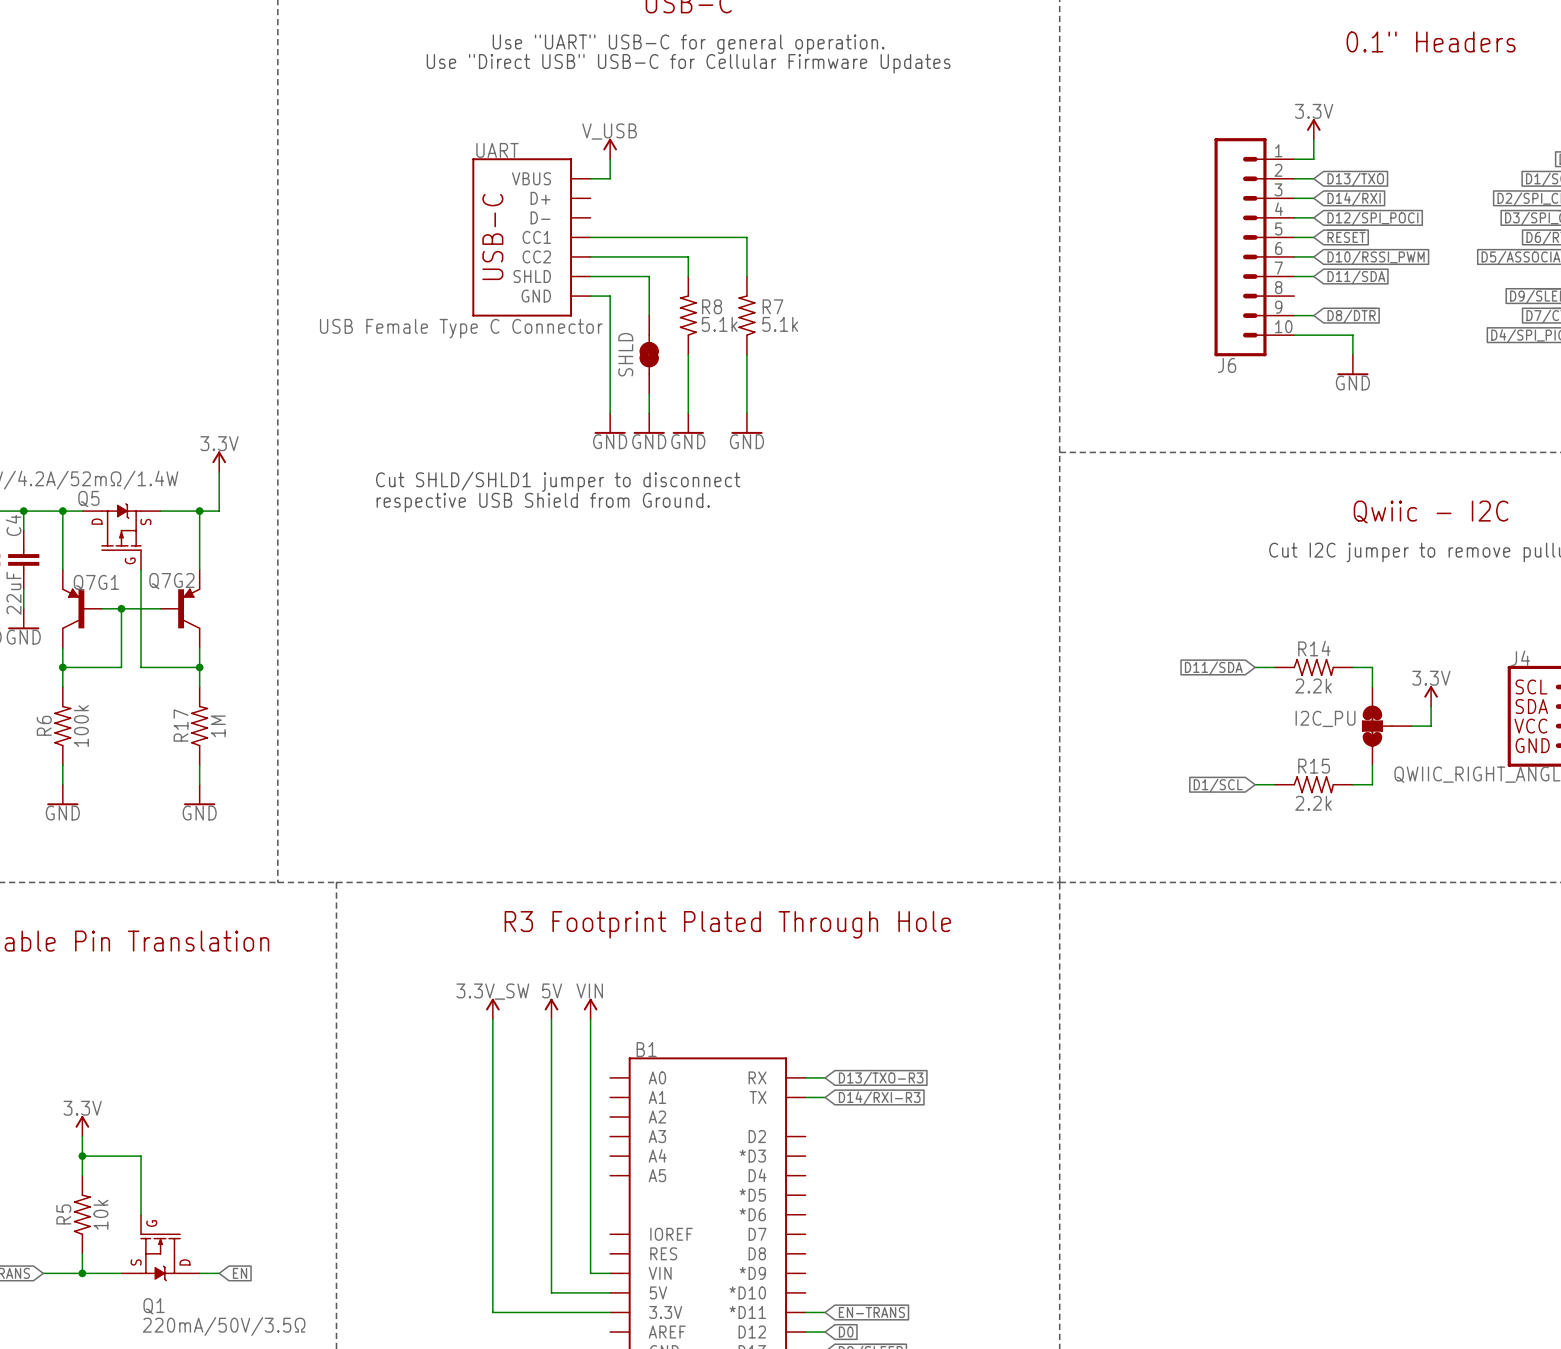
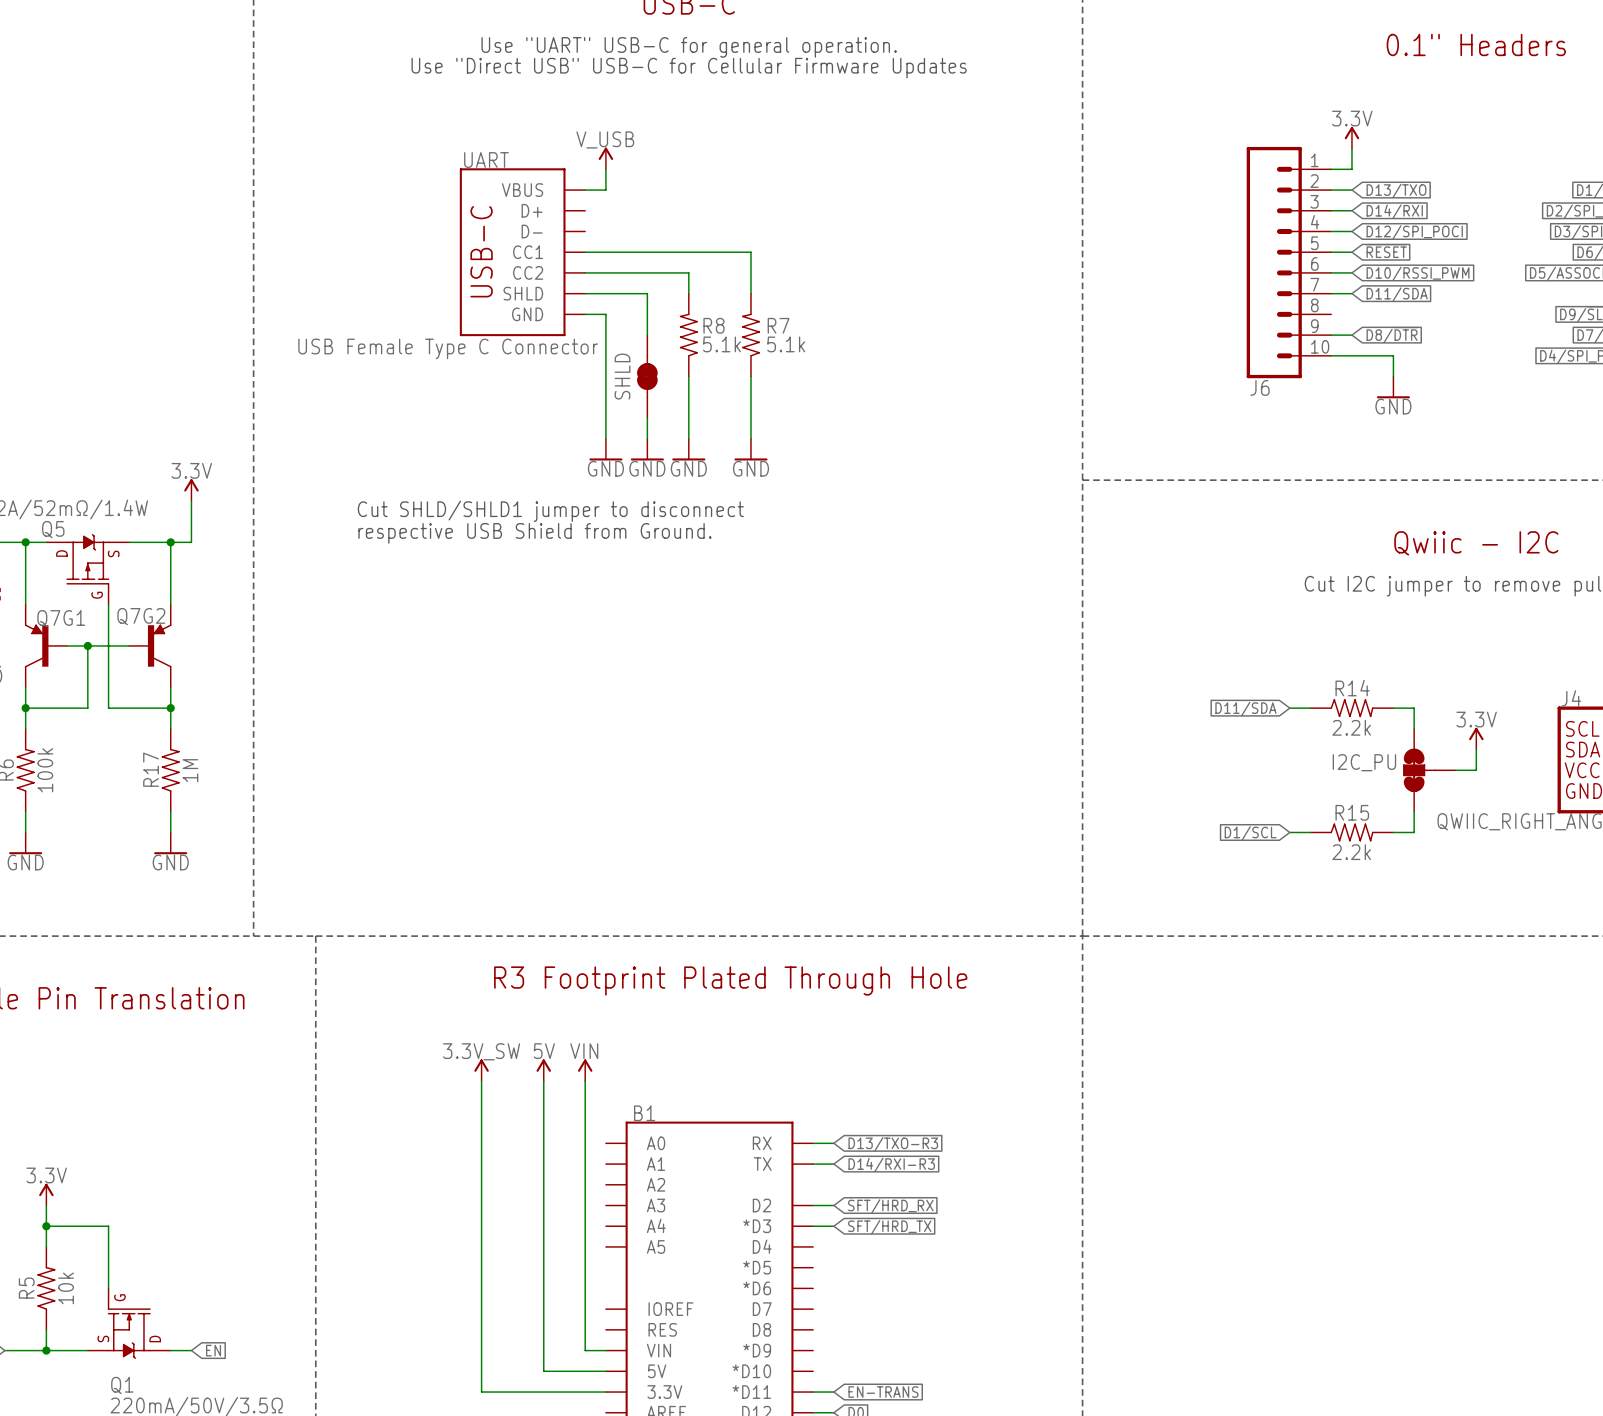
wire: none -> (813, 1205) (833, 1205)
global label: none -> SFT/HRD_RX (890, 1206)
wire: none -> (813, 1226) (833, 1226)
global label: none -> SFT/HRD_TX (889, 1227)

